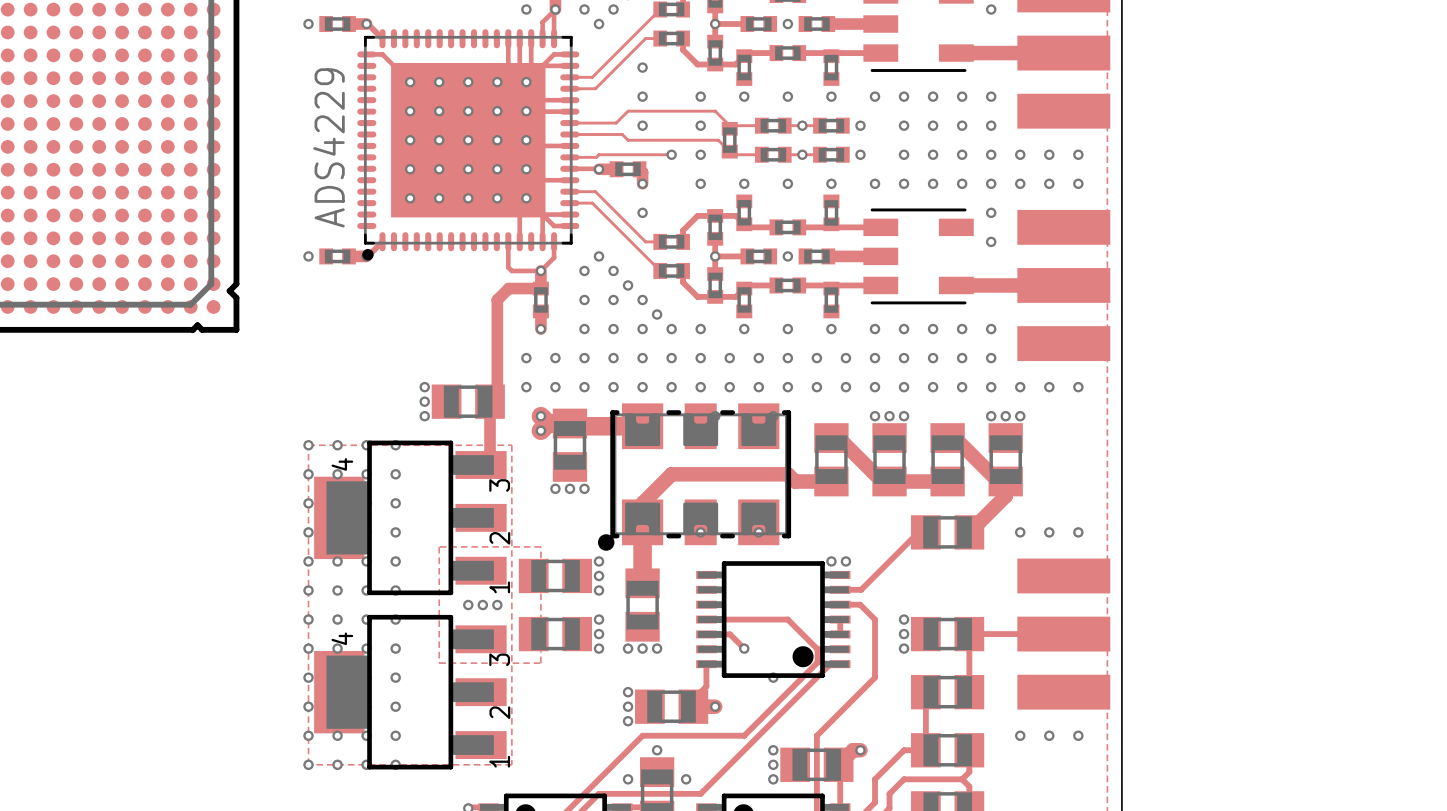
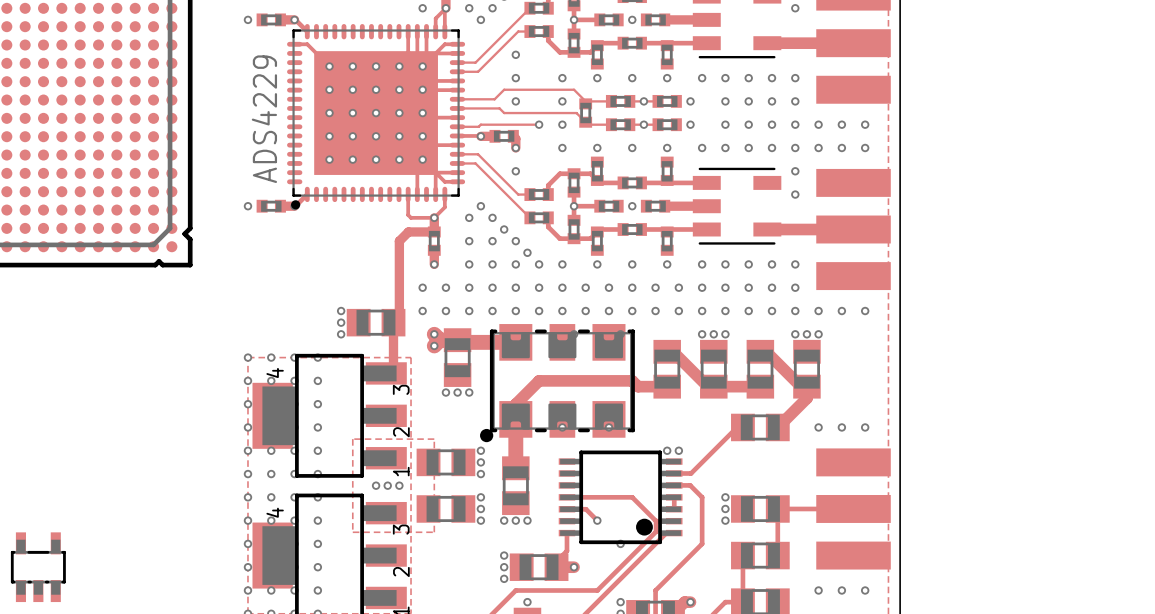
part: none -> (38, 567)

